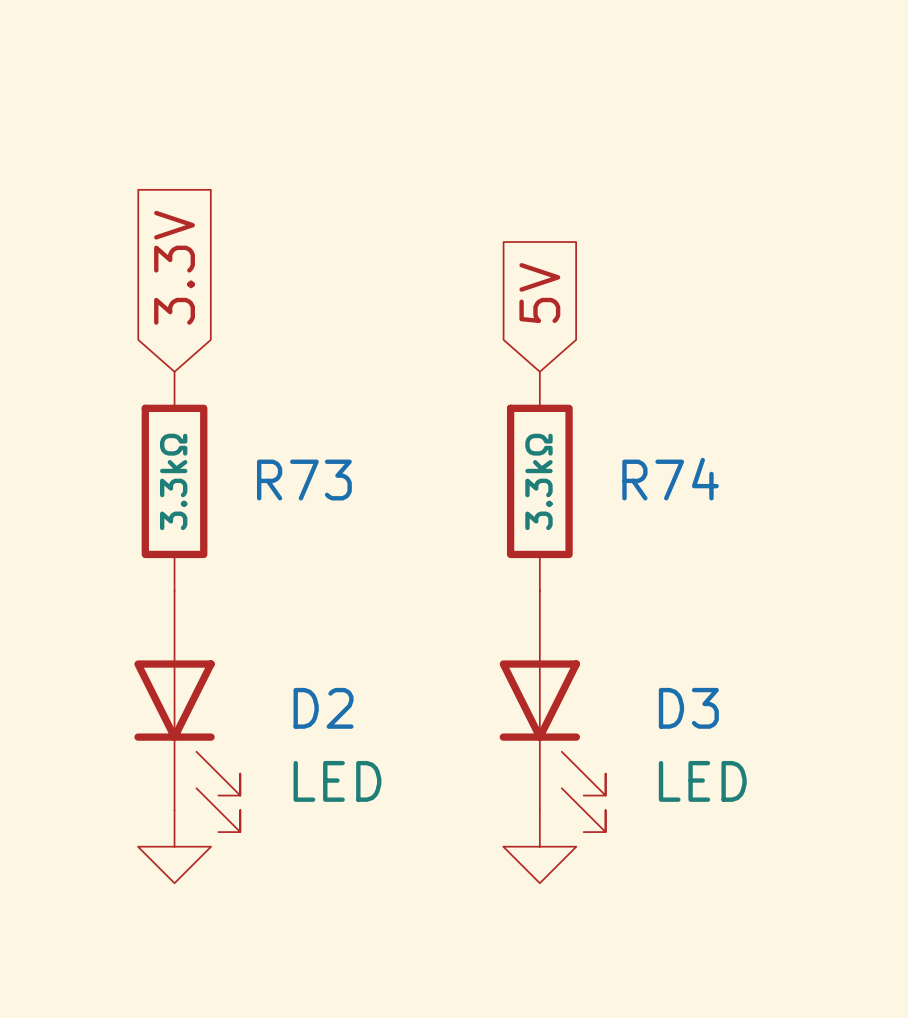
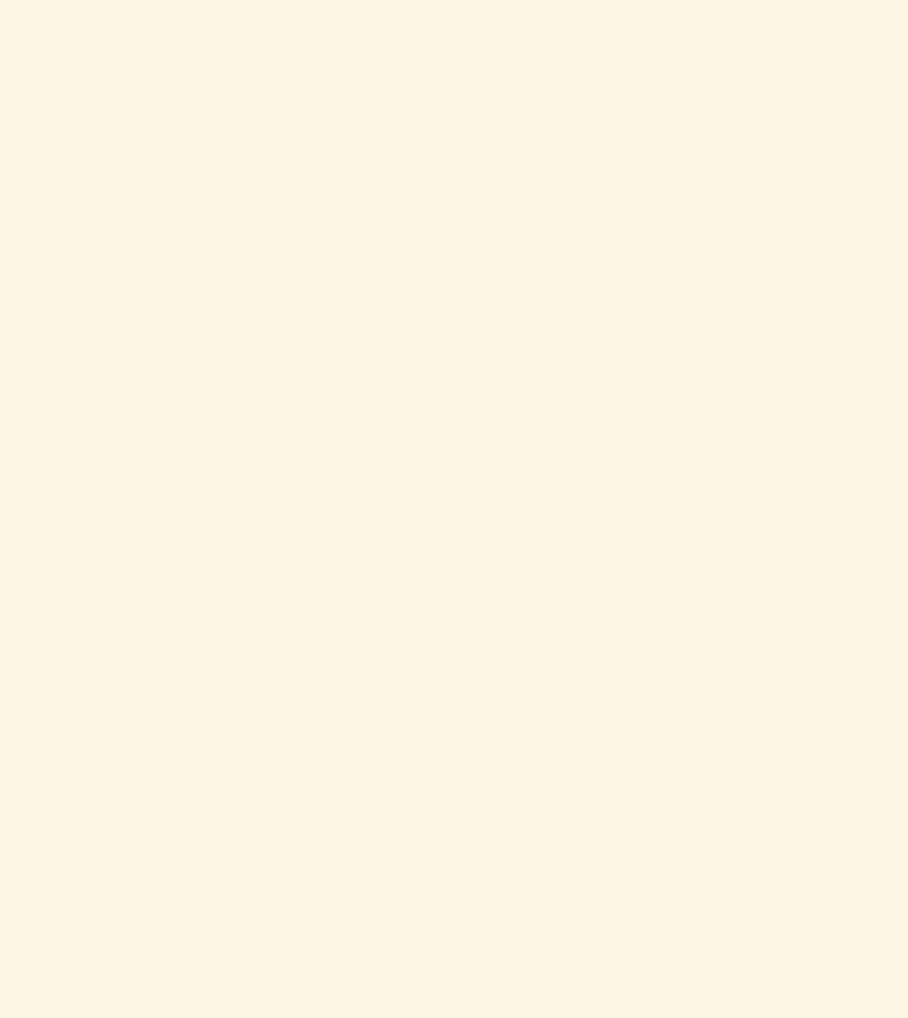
global label: 3.3V (174, 267) -> none
global label: 5V (539, 293) -> none
R73: 3.3kΩ (174, 481) -> none
R74: 3.3kΩ (539, 481) -> none
D2: LED (187, 711) -> none
D3: LED (552, 711) -> none
power symbol: (174, 846) -> none
power symbol: (539, 846) -> none

